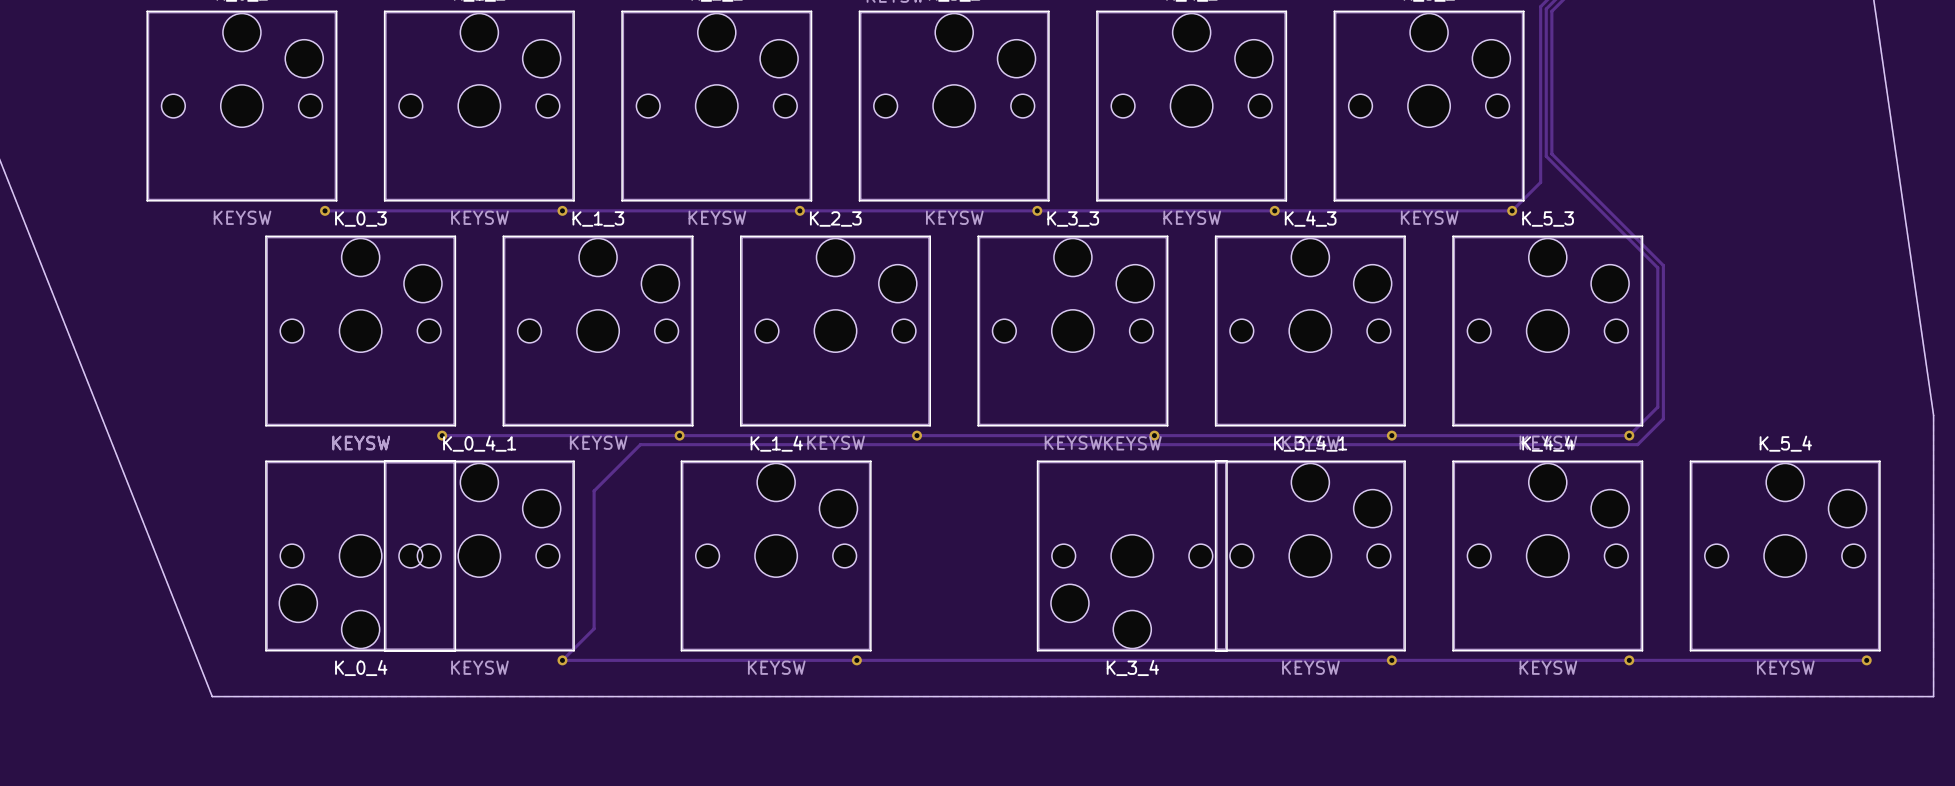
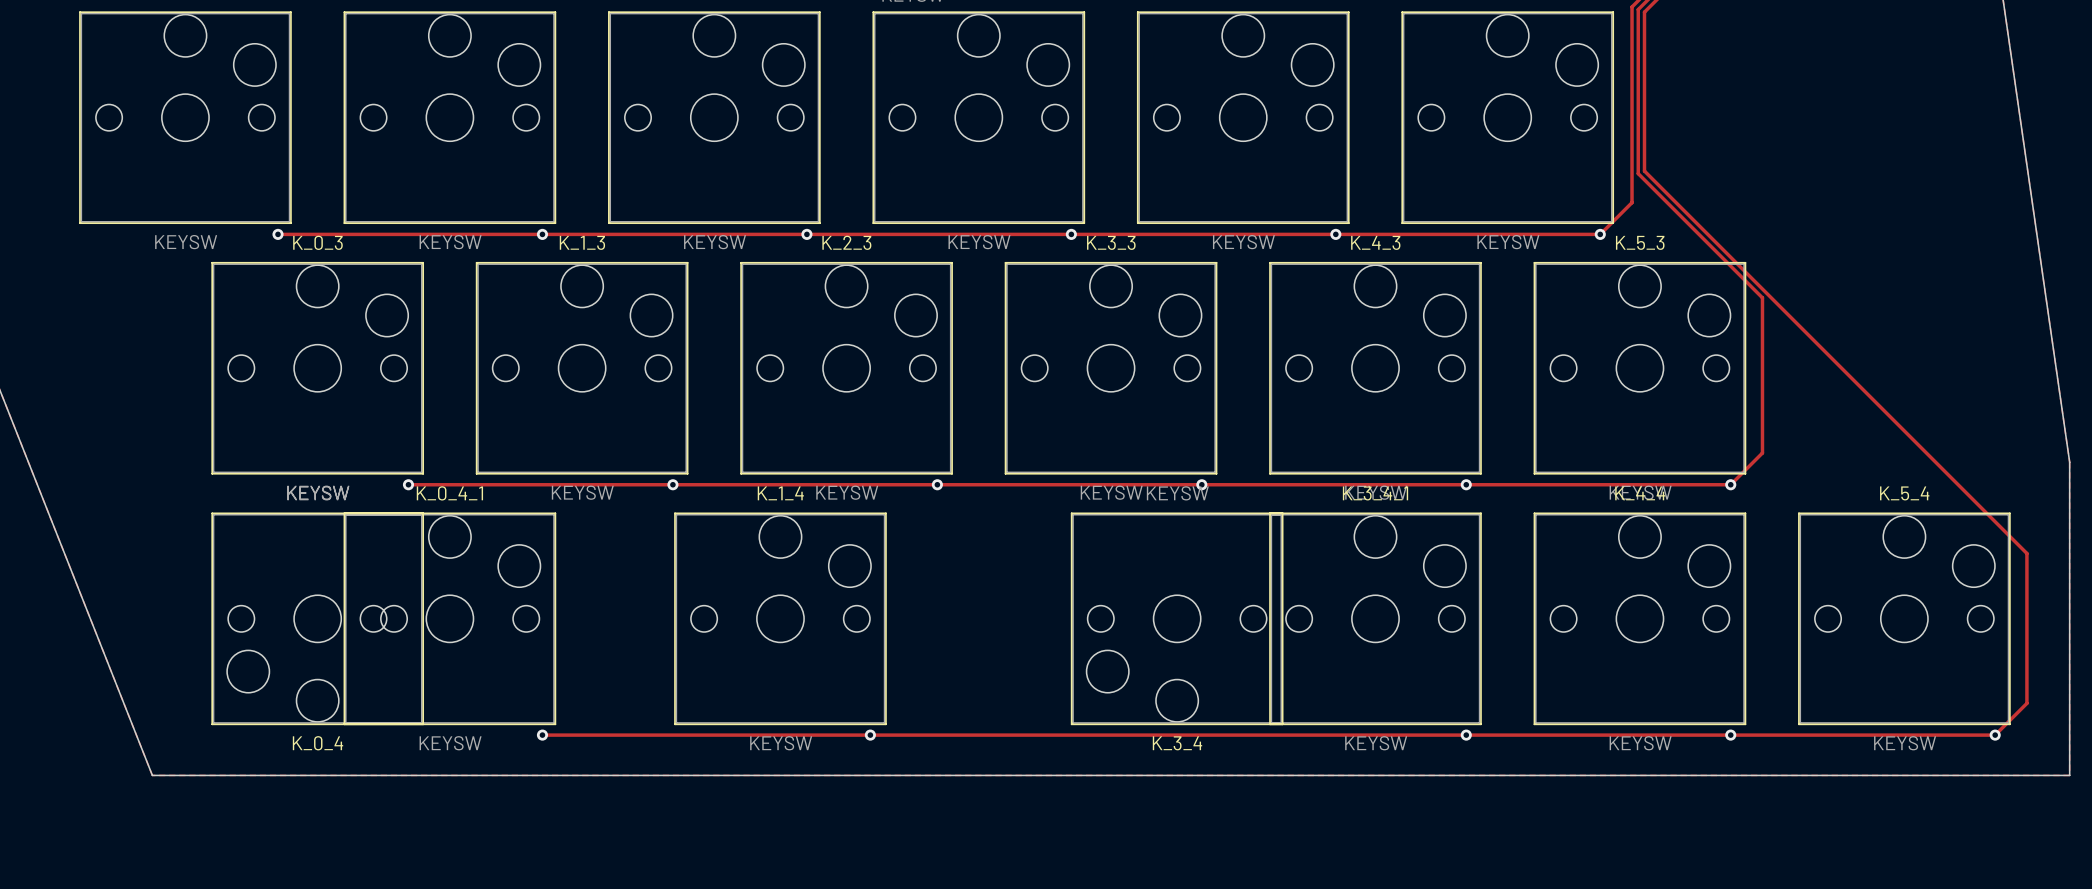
track: (1663, 265) (1663, 418) (1637, 444) (640, 444) (594, 491) (594, 628) (562, 660) -> (1768, 295) (2026, 553) (2026, 703) (1995, 735)

